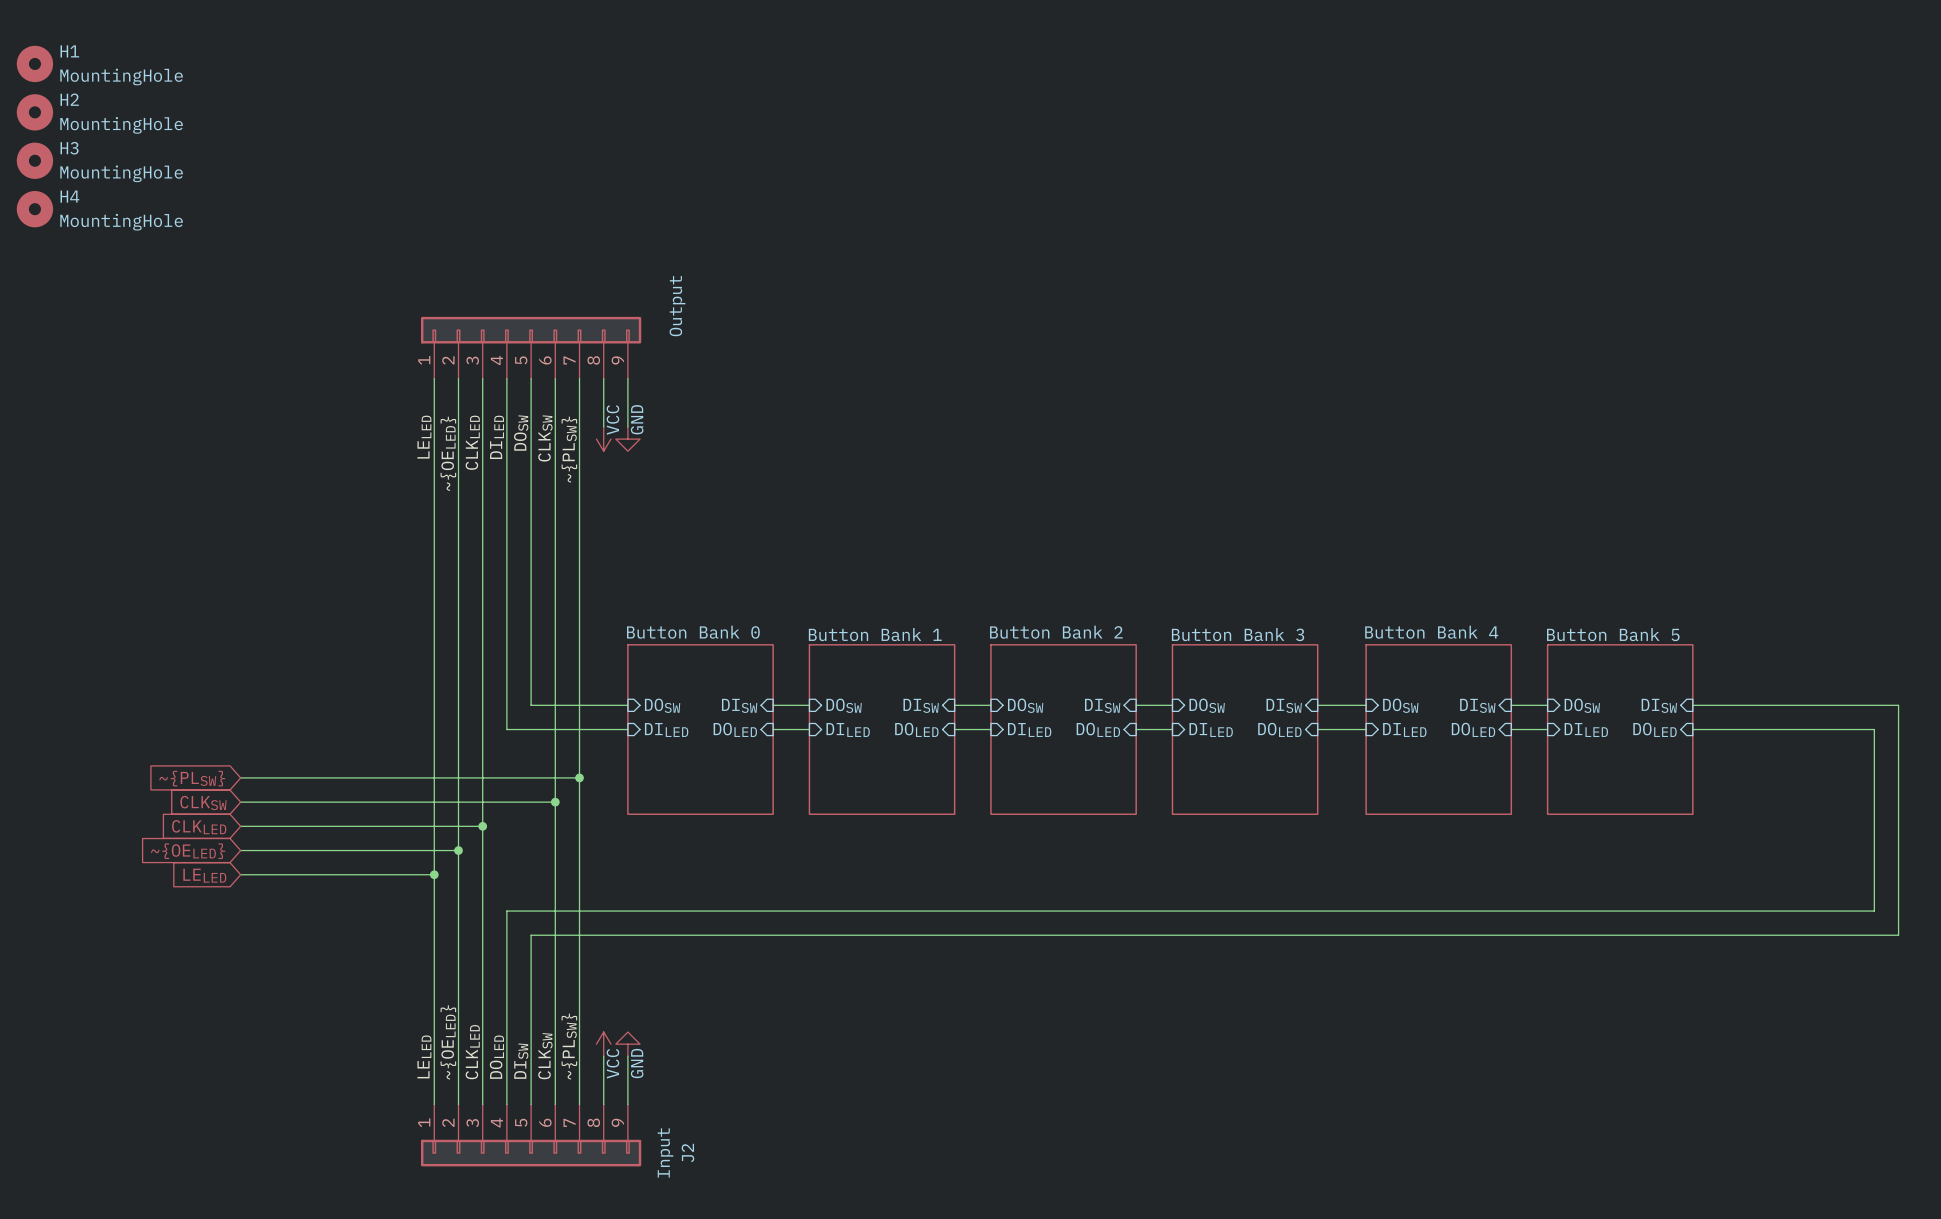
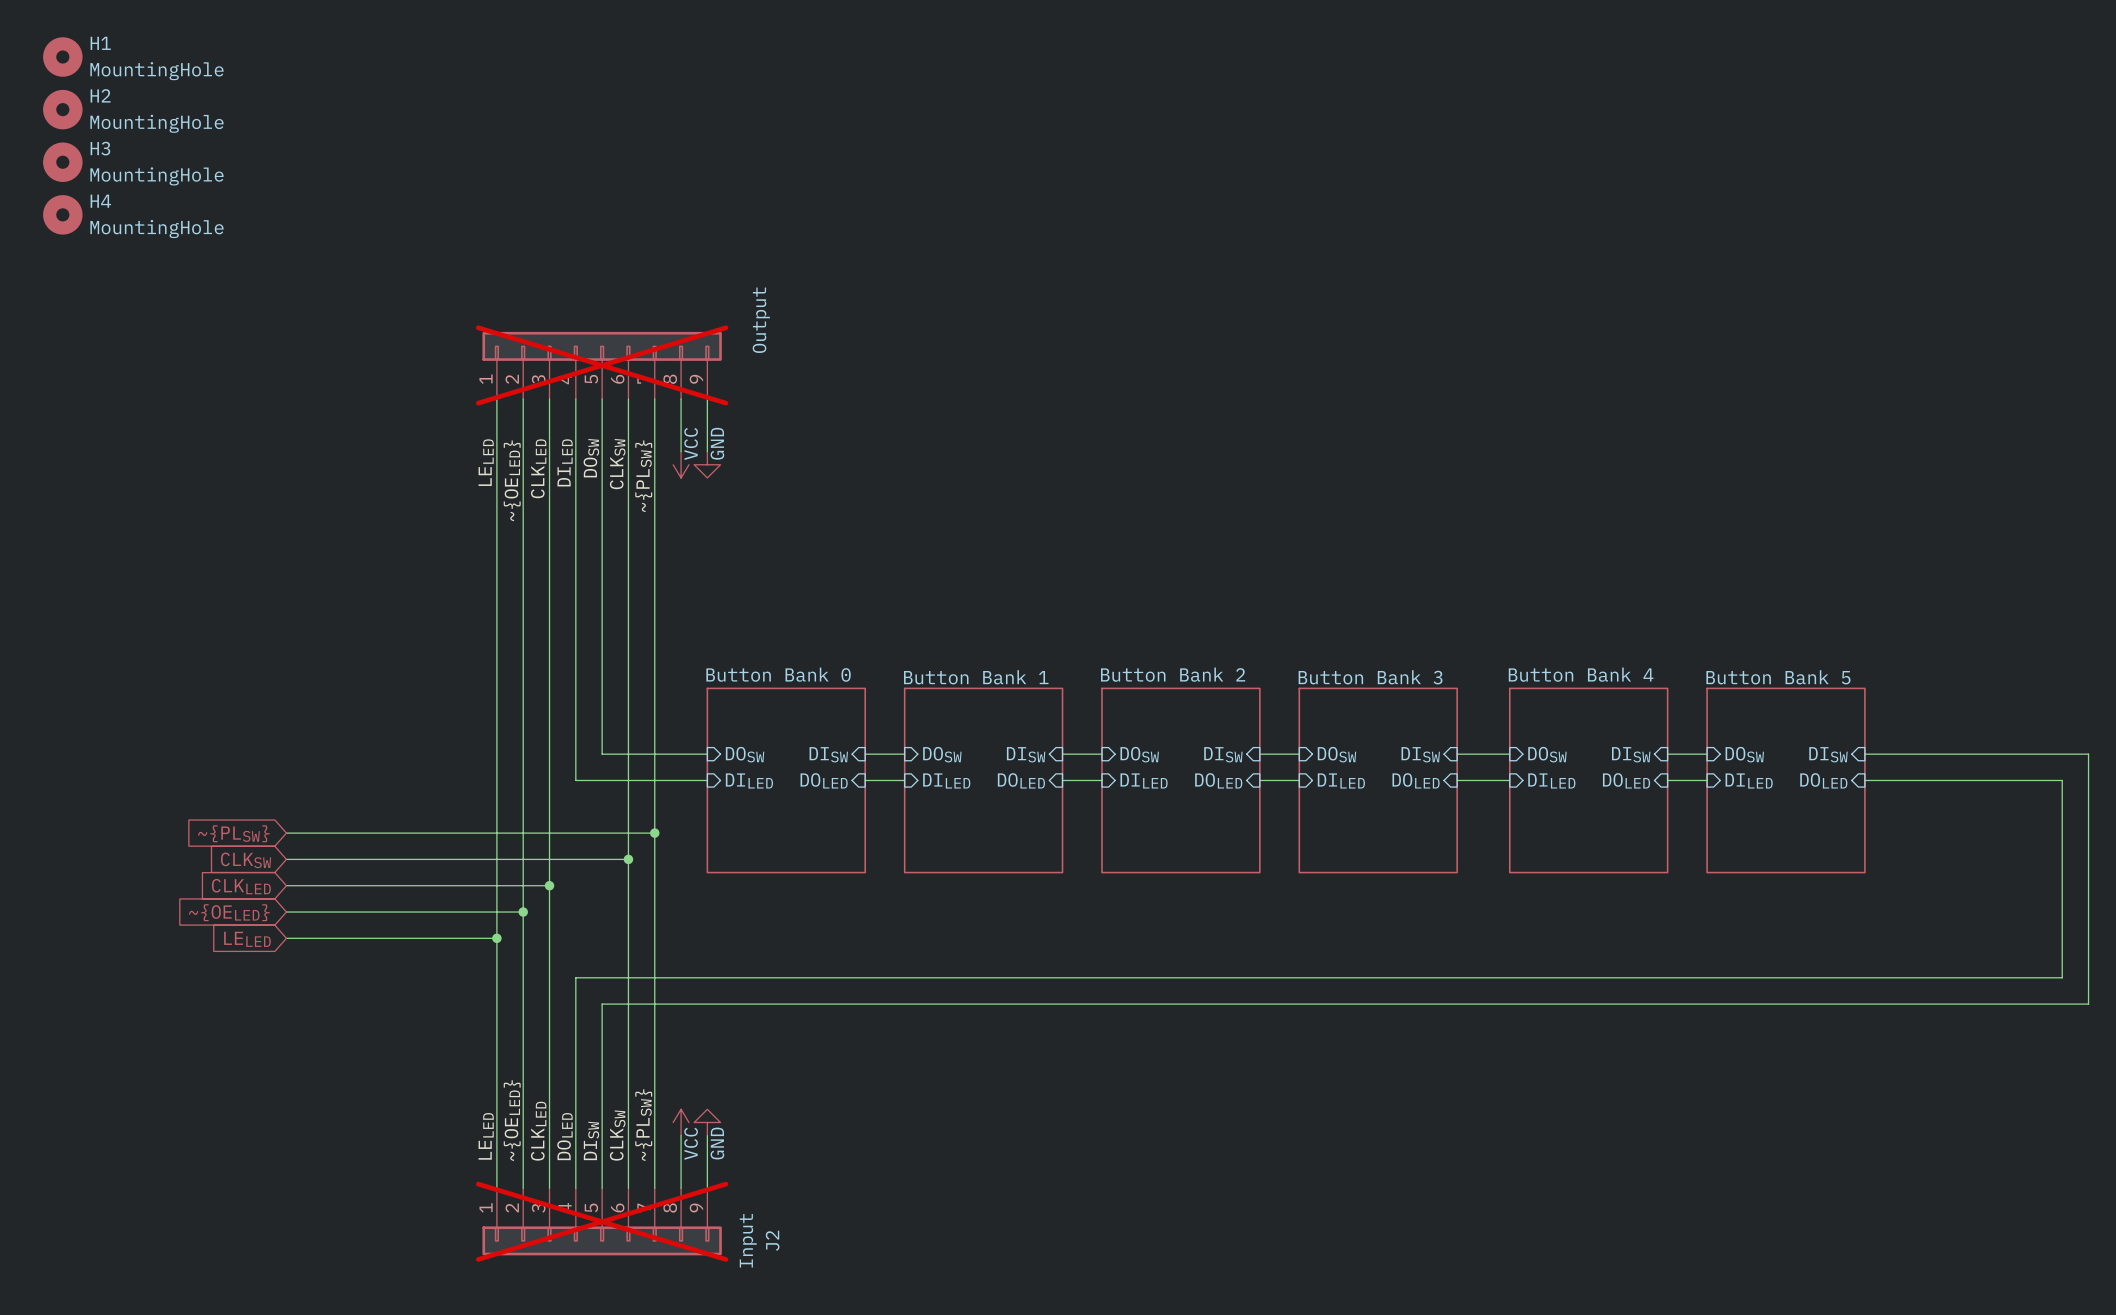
part do-not-place cross: none -> (602, 365)
J2 do-not-place cross: none -> (602, 1221)

